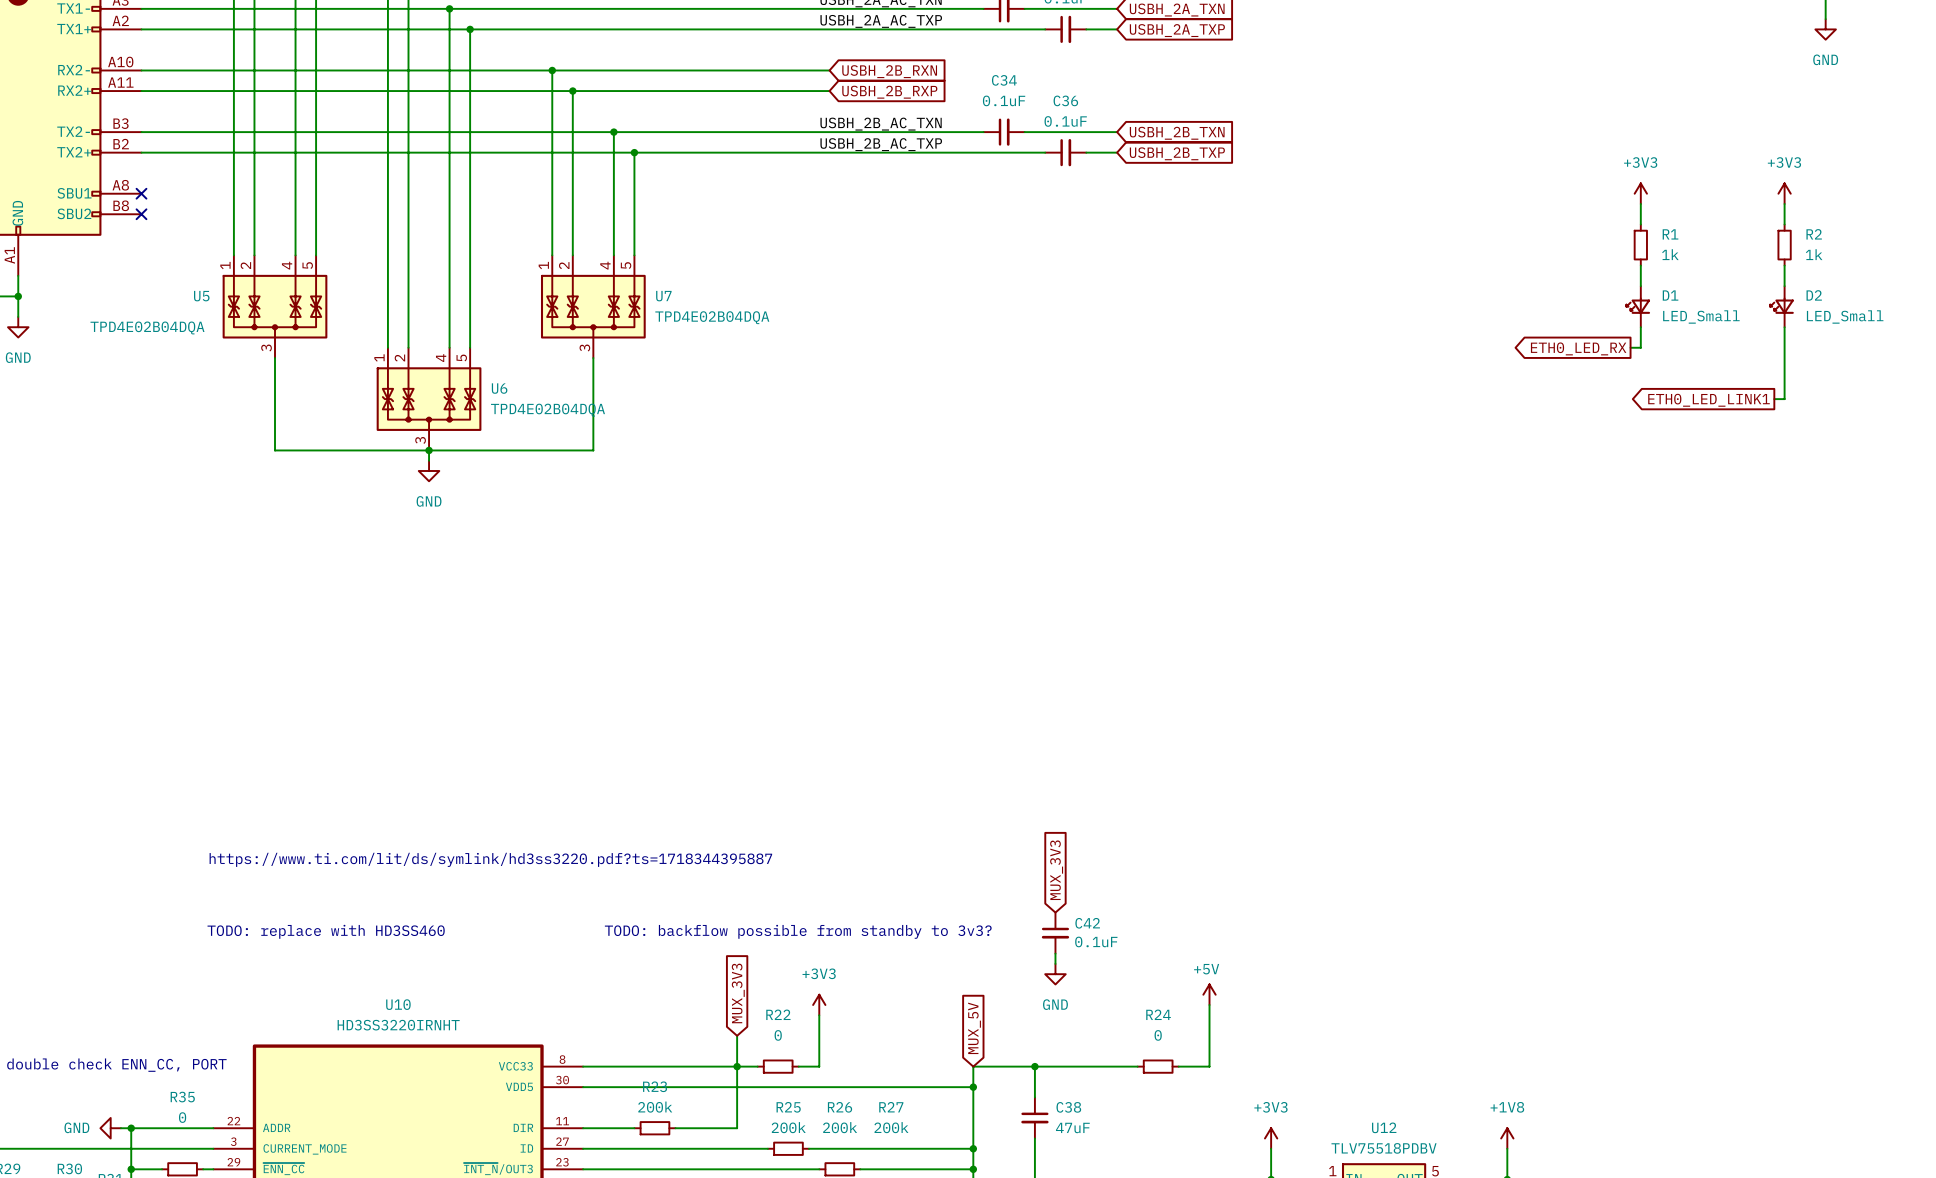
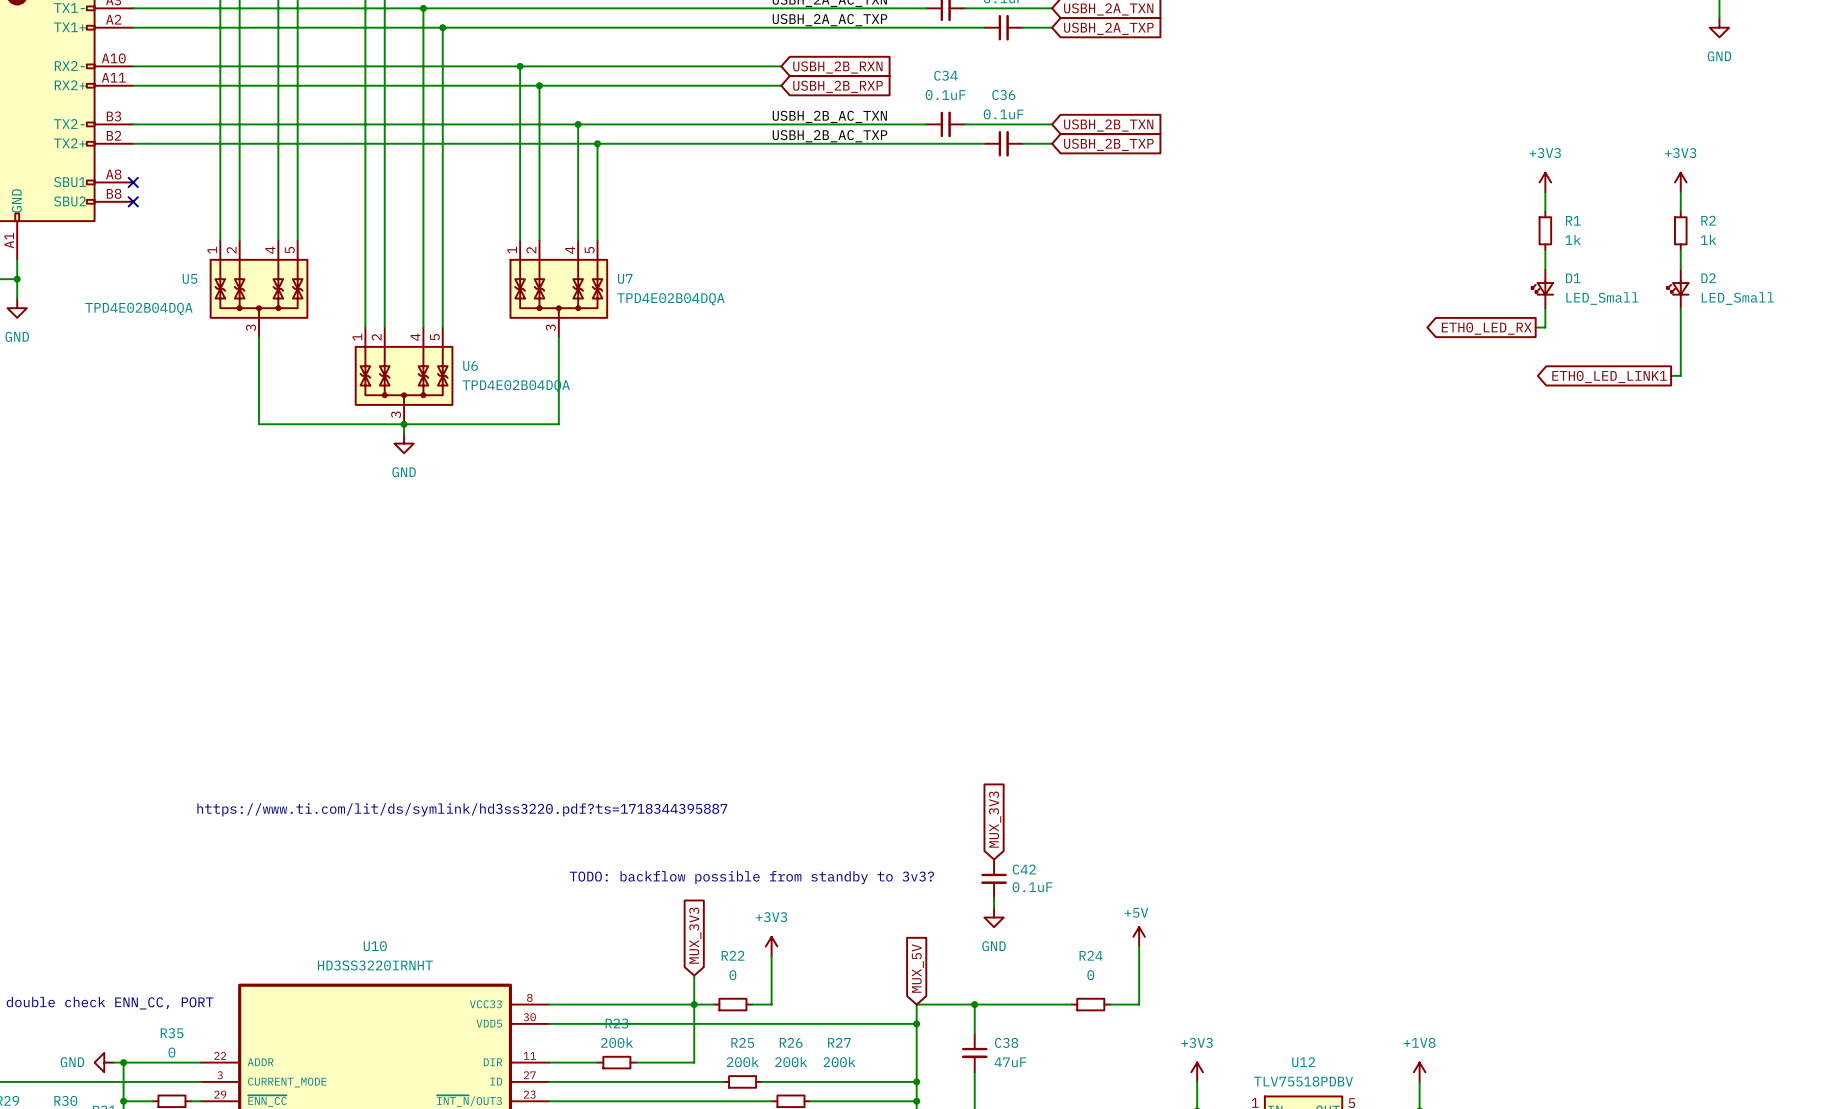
text: TODO: replace with HD3SS460 (326, 931) -> none

